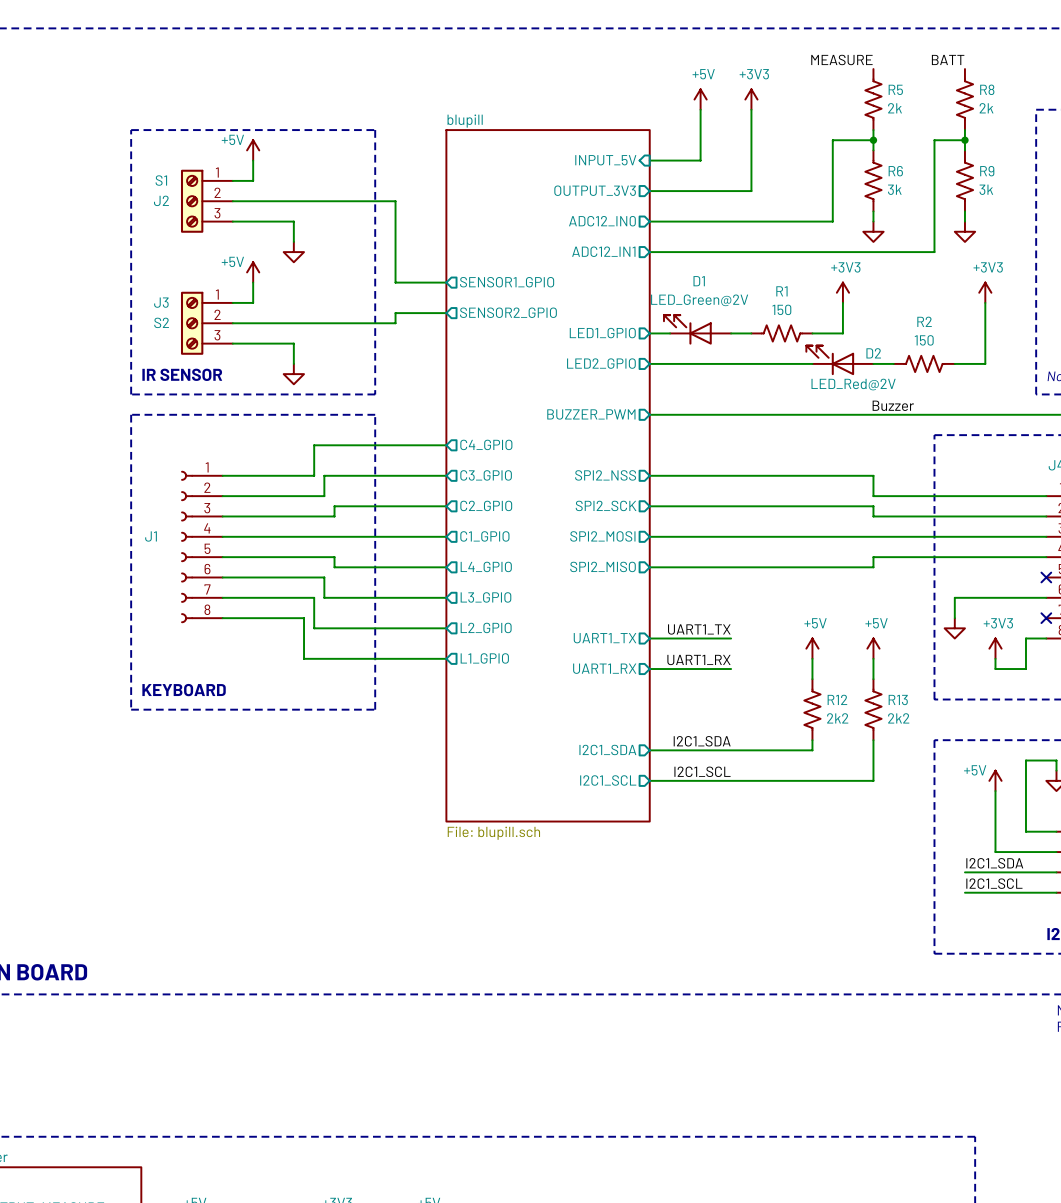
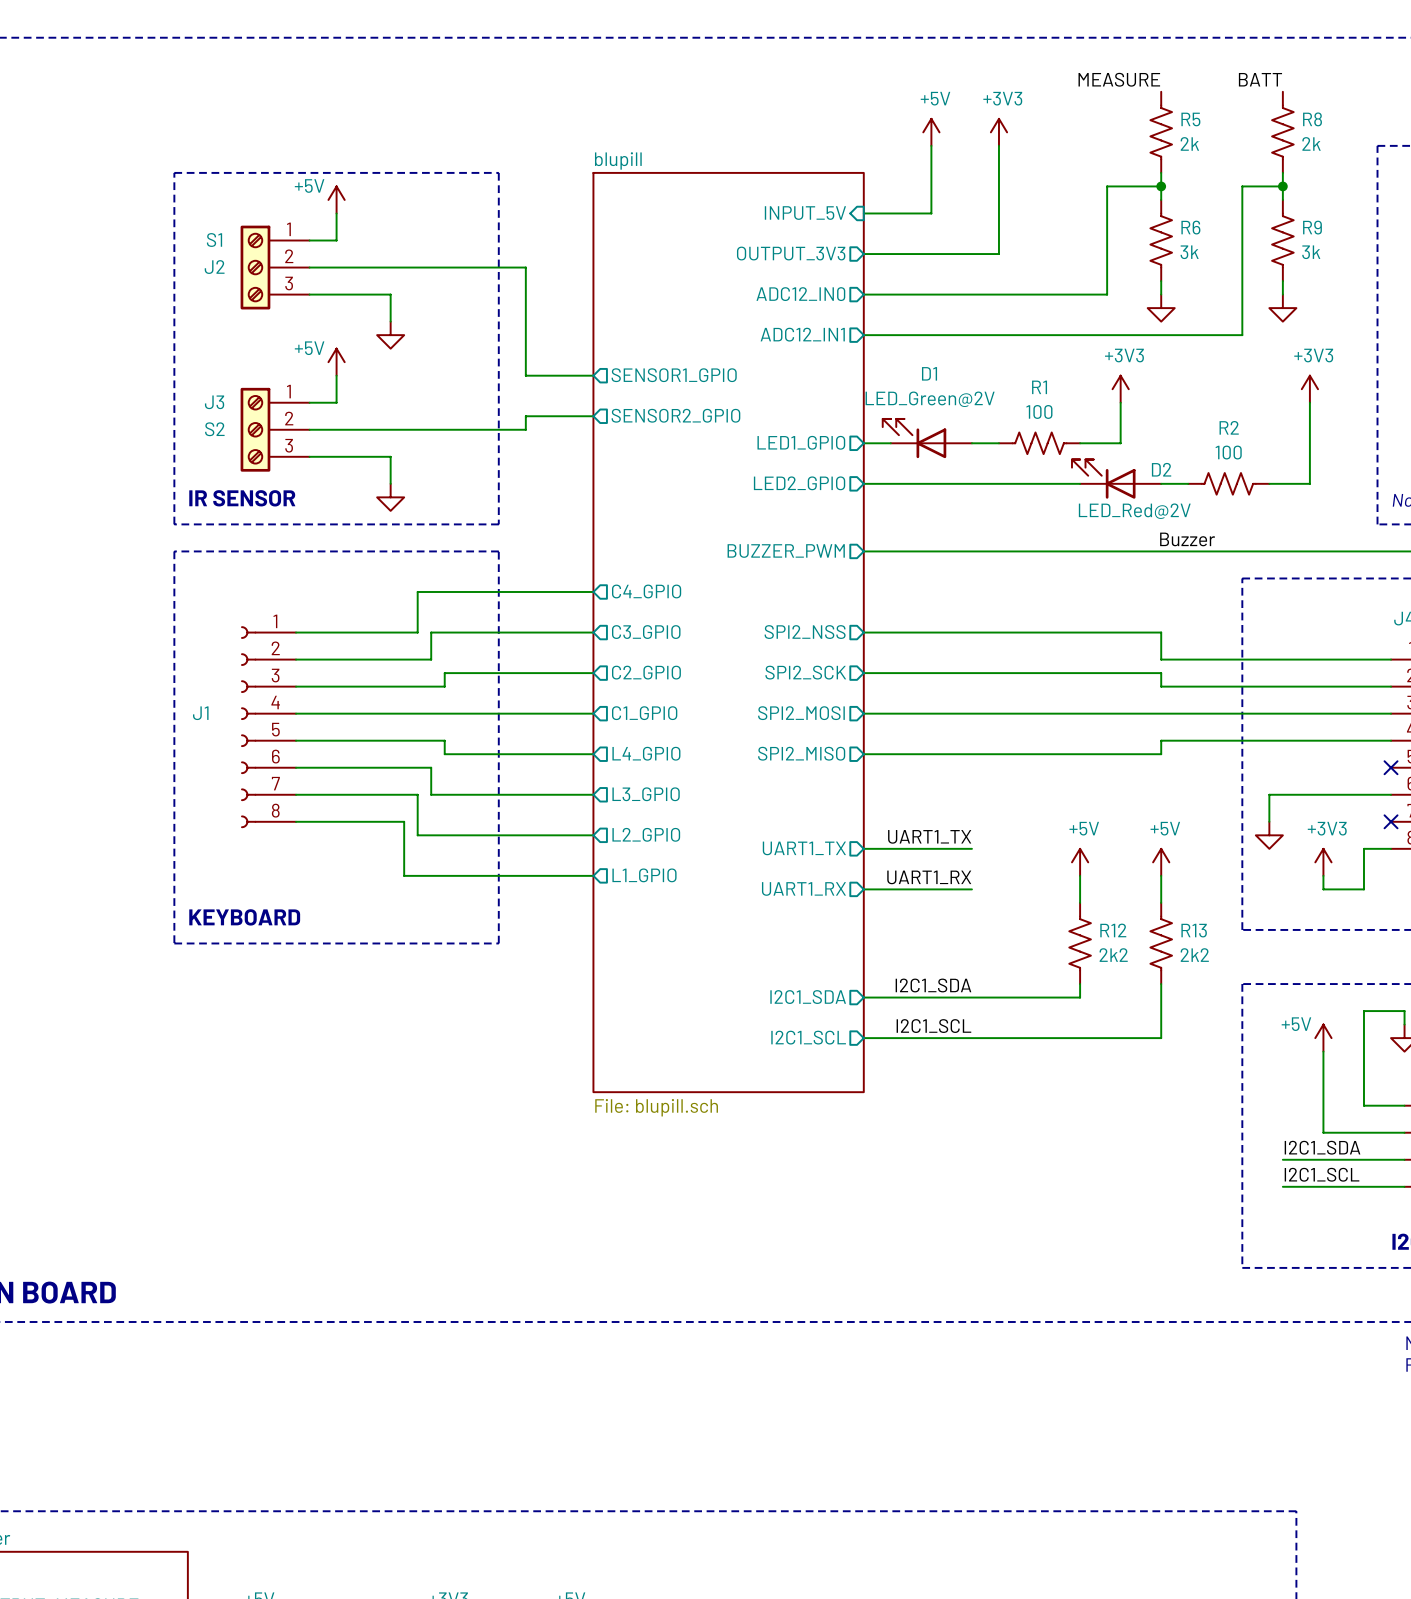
R1 value: 150 (781, 309) -> 100 (1039, 411)
R2 value: 150 (924, 340) -> 100 (1228, 452)

